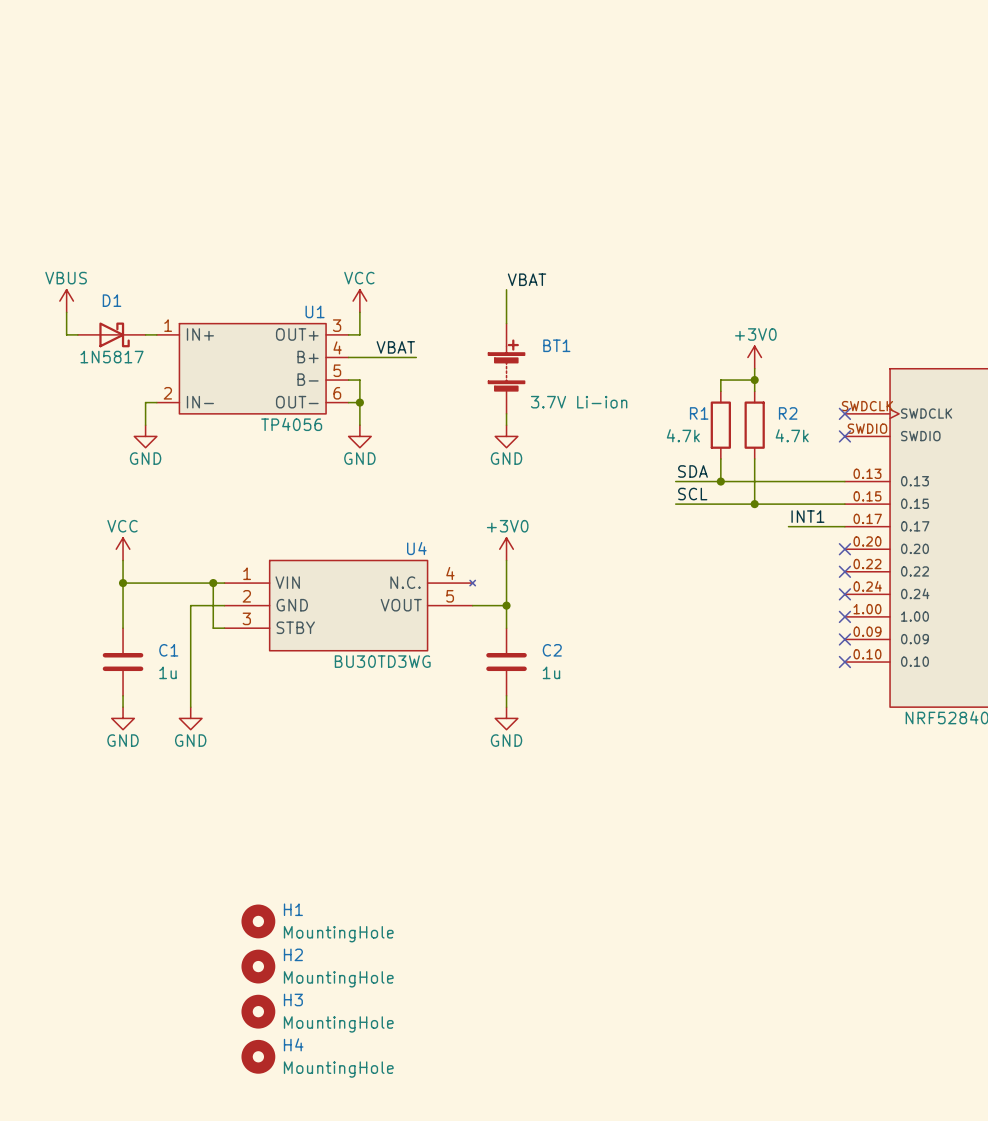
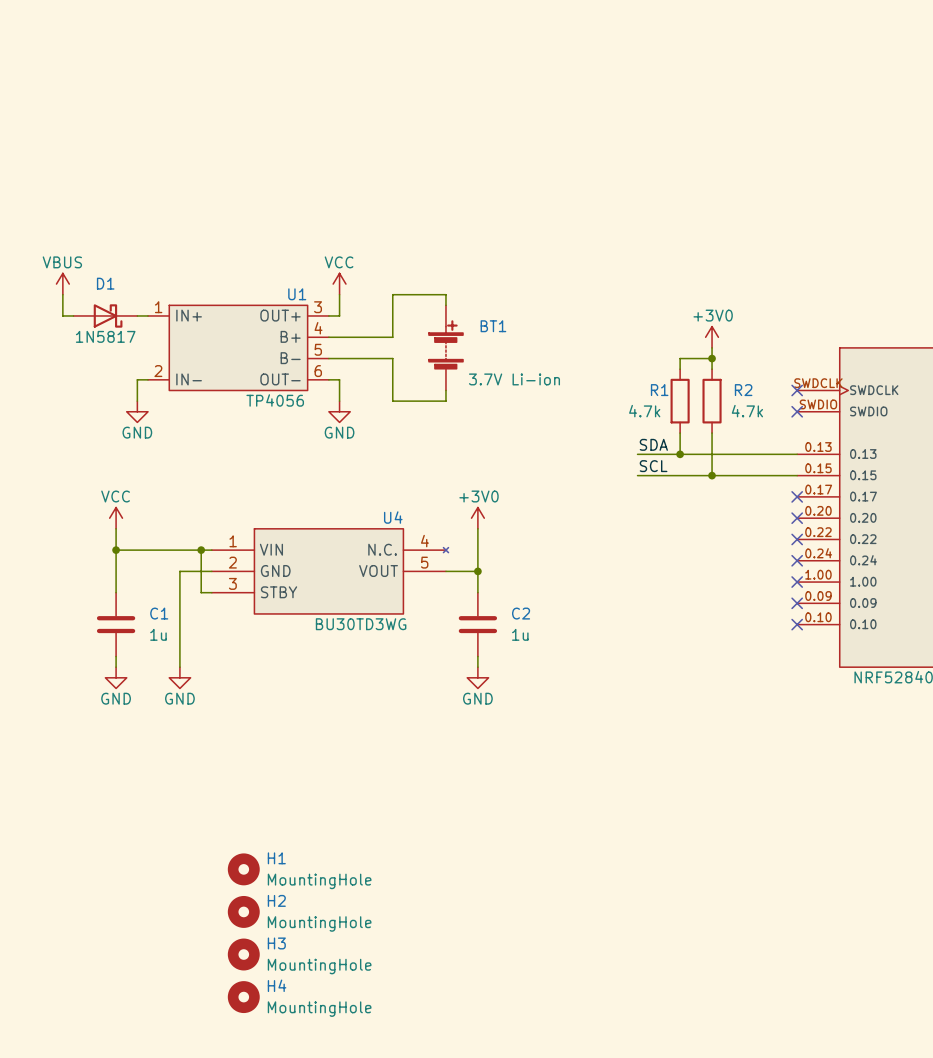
label: VBAT (527, 279) -> none
wire: (506, 289) (506, 323) -> none
wire: none -> (445, 305) (445, 294) (392, 294) (392, 337)
label: VBAT (395, 347) -> none
BT1 position: (506, 368) -> (445, 347)
wire: (359, 380) (359, 402) -> (339, 358) (392, 358) (392, 401) (445, 401) (445, 390)
junction: (359, 402) -> none
wire: (506, 413) (506, 425) -> none
power symbol: GND (506, 436) -> none
label: INT1 (807, 516) -> none
wire: (788, 526) (844, 526) -> none
no-connect mark: none -> (797, 496)

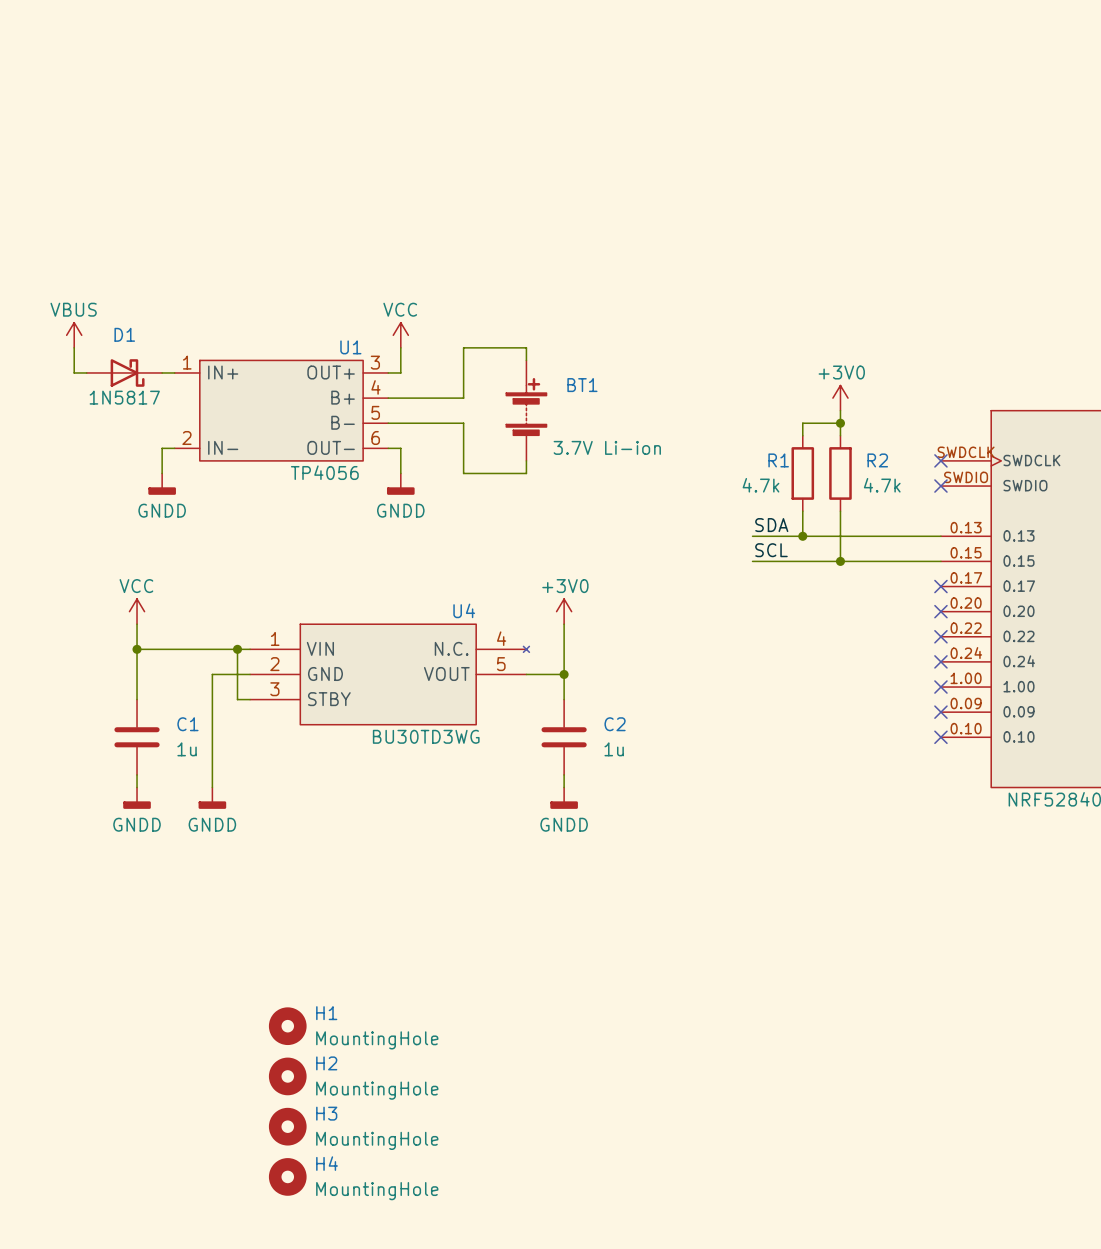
power symbol: GND (137, 411) -> GNDD (162, 484)
power symbol: GND (339, 411) -> GNDD (400, 484)
power symbol: GND (116, 677) -> GNDD (137, 798)
power symbol: GND (179, 677) -> GNDD (212, 798)
power symbol: GND (477, 677) -> GNDD (564, 798)

